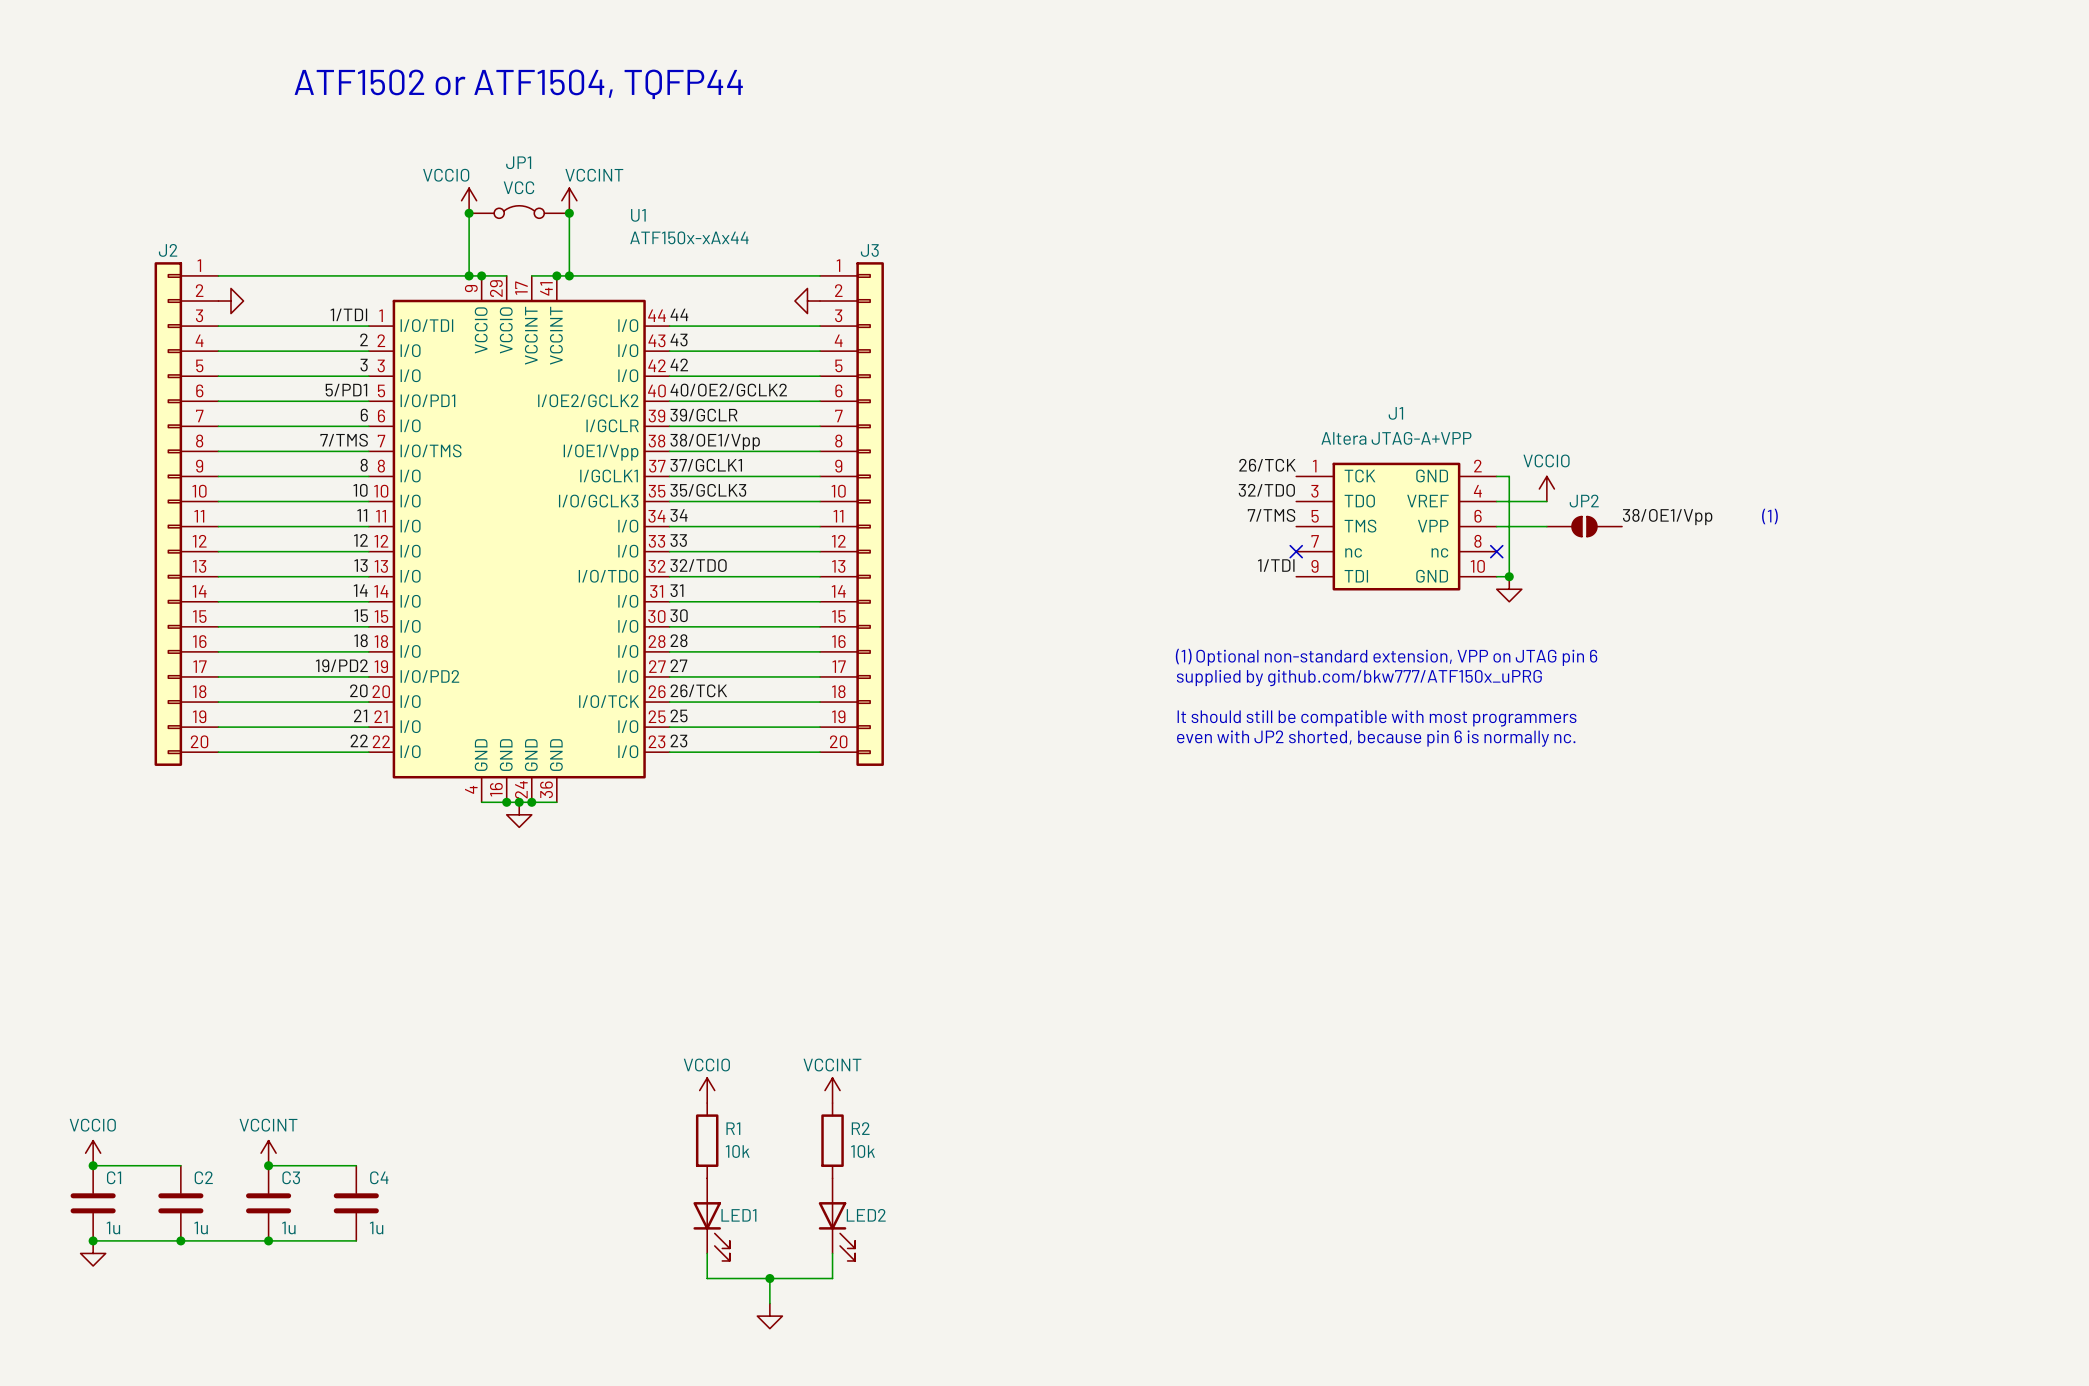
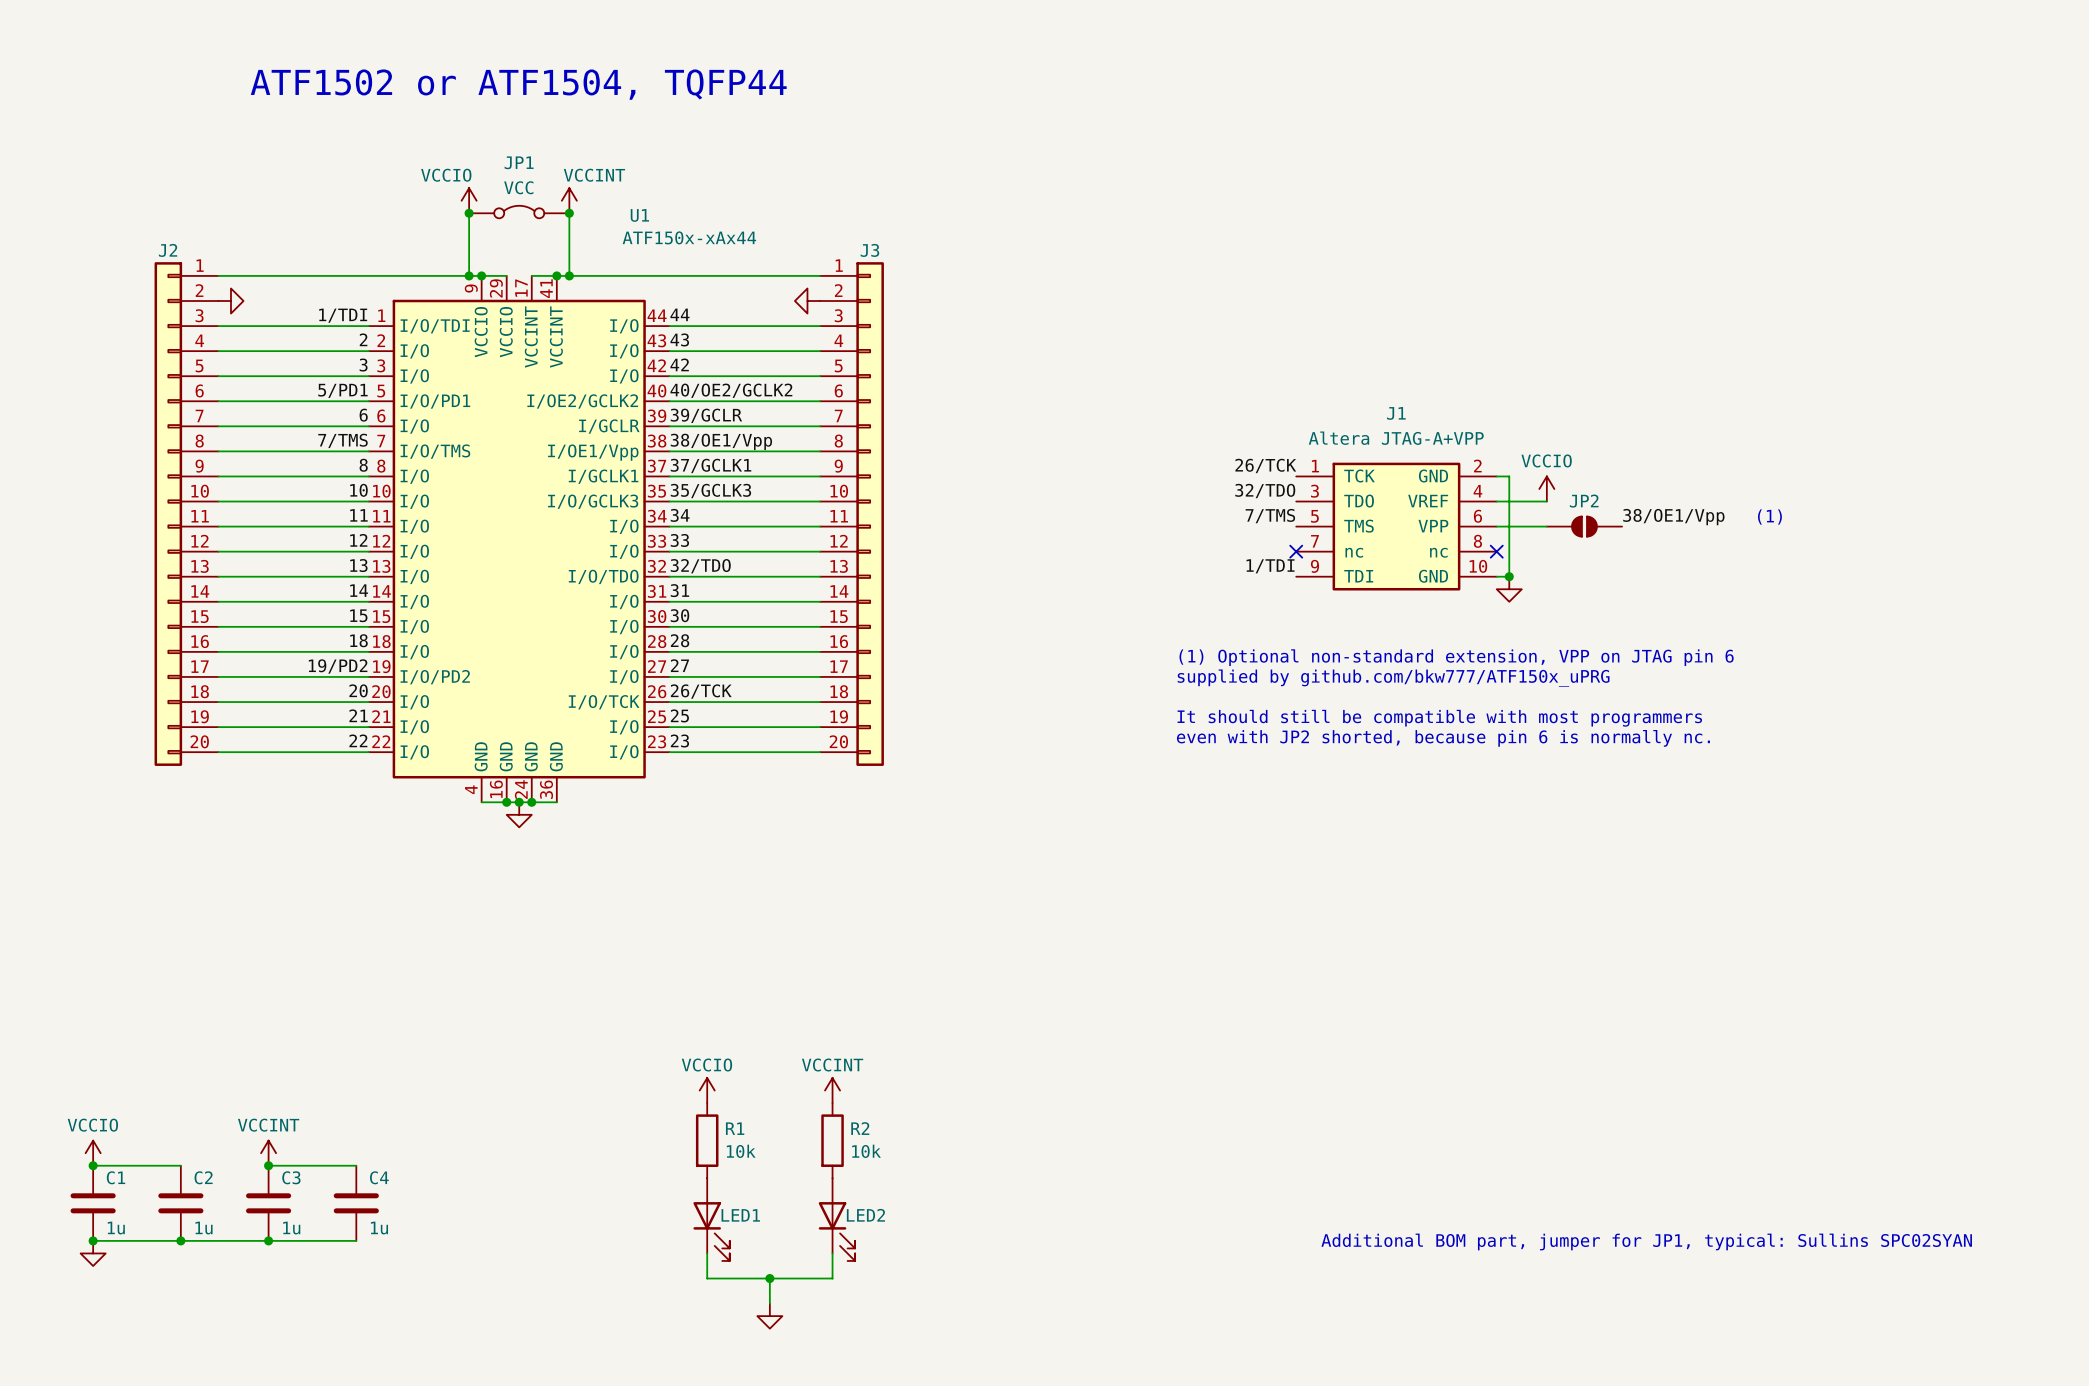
text: none -> Additional BOM part, jumper for JP1, typical: Sullins SPC02SYAN (1646, 1241)

